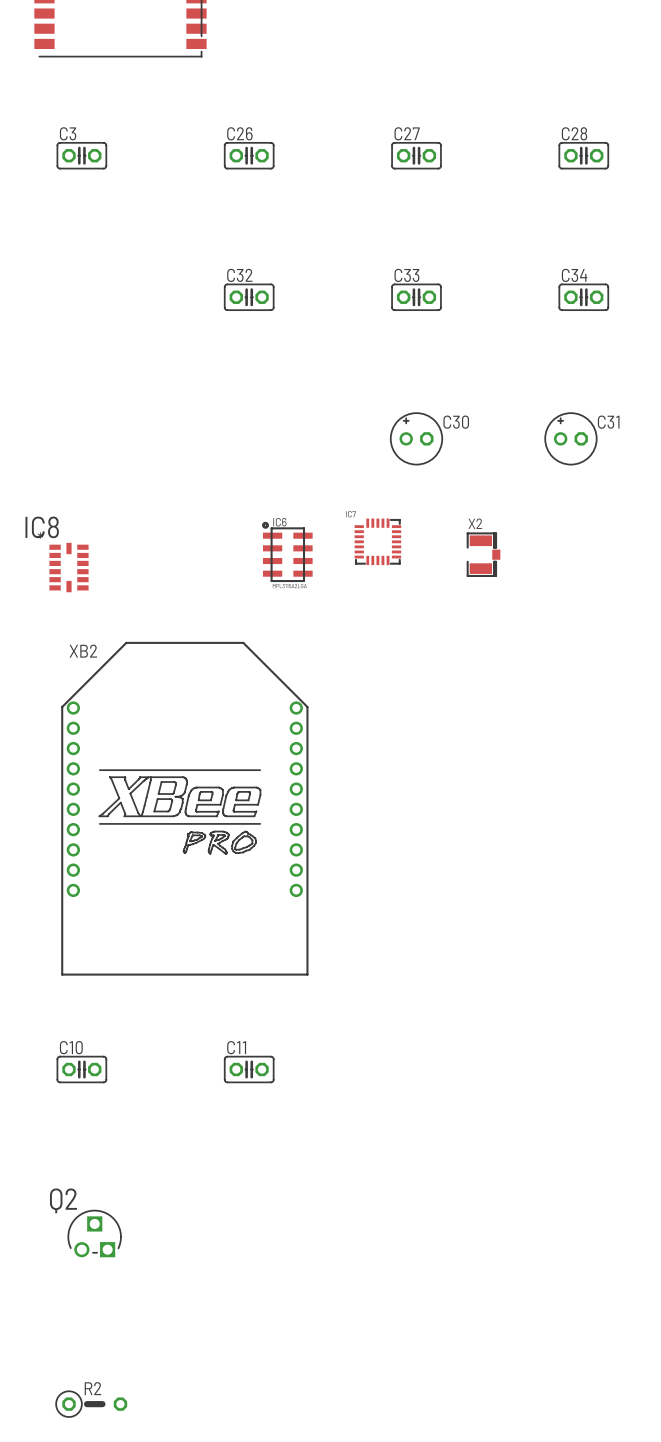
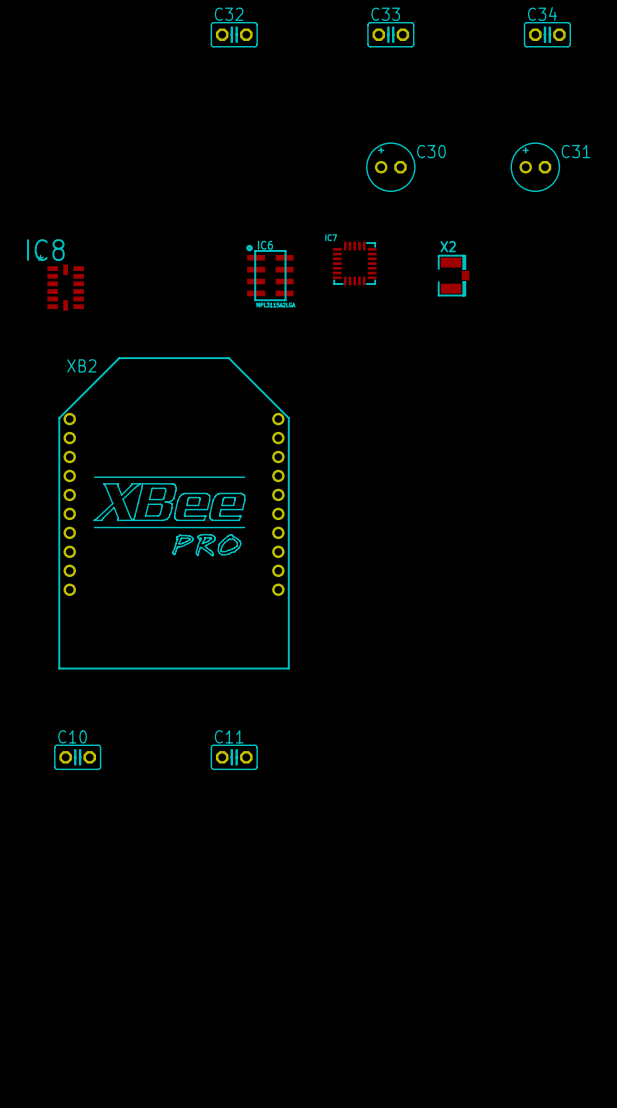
Q2: (94, 1233) -> none
R2: (91, 1404) -> none

